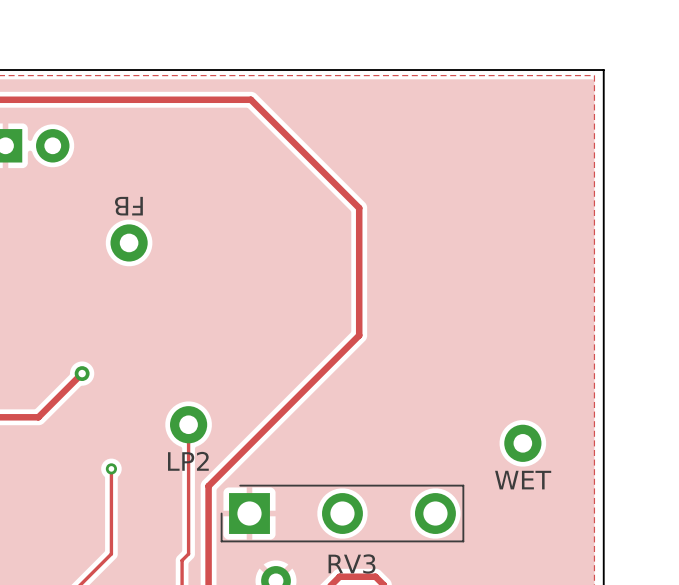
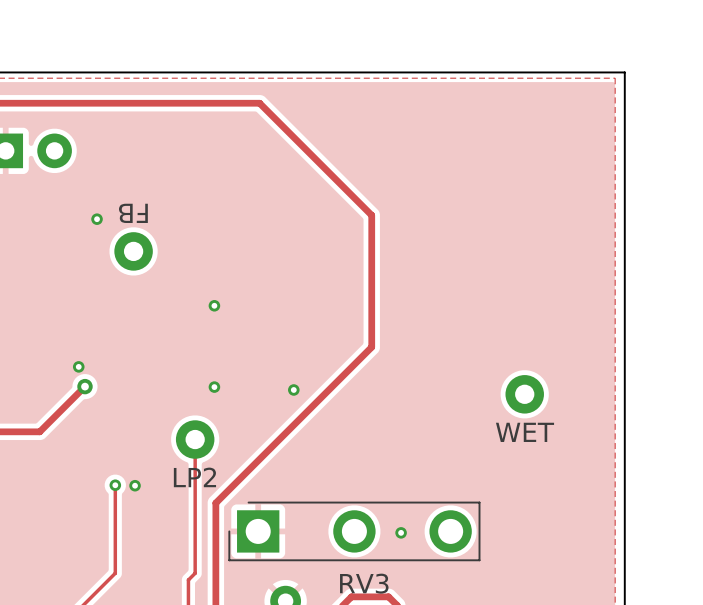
via: none -> (97, 219)
via: none -> (214, 305)
via: none -> (78, 366)
via: none -> (214, 387)
via: none -> (293, 389)
part position: (522, 443) -> (524, 394)
via: none -> (135, 485)
via: none -> (401, 532)

